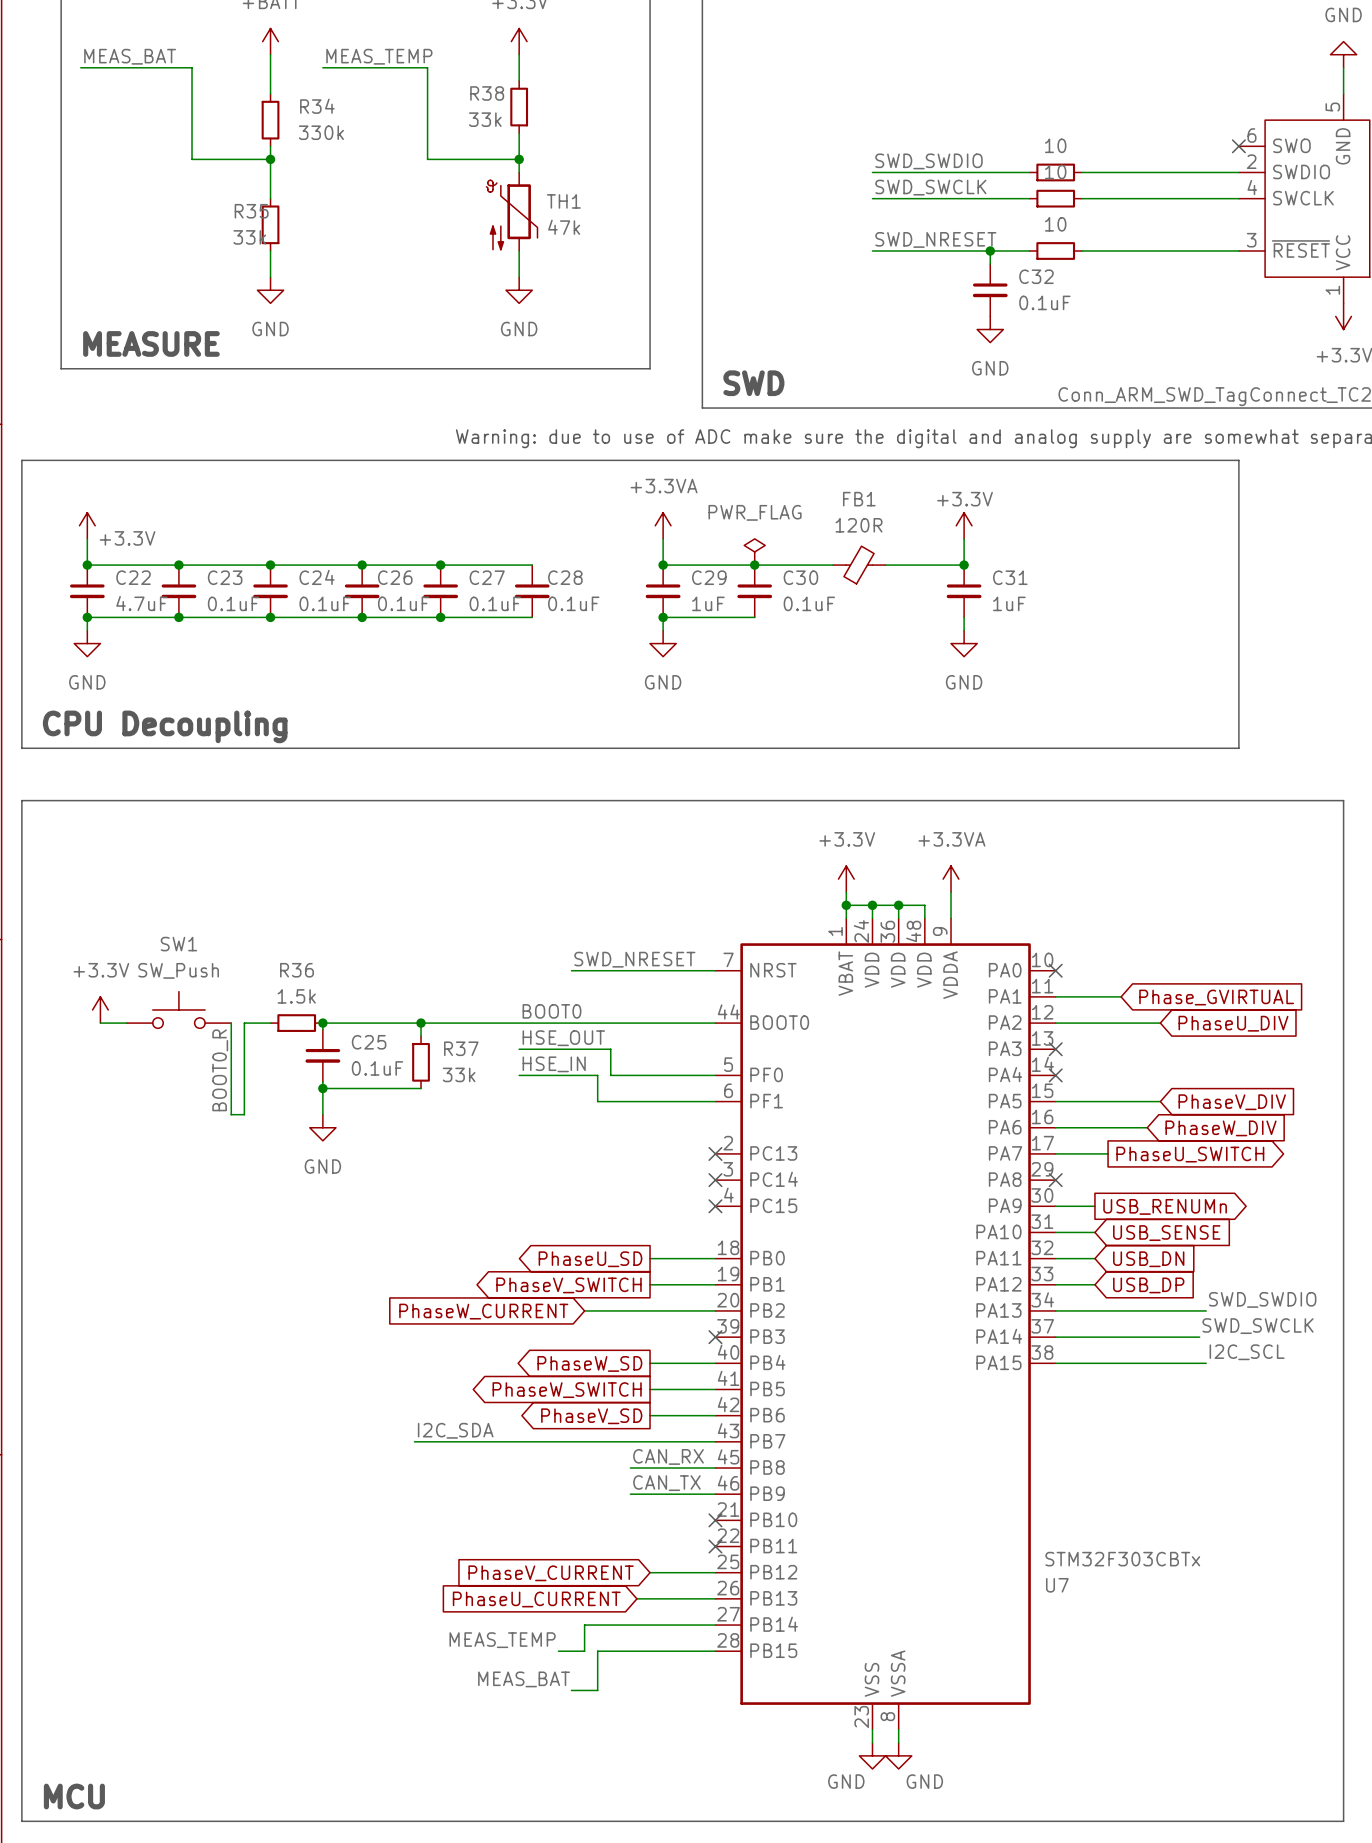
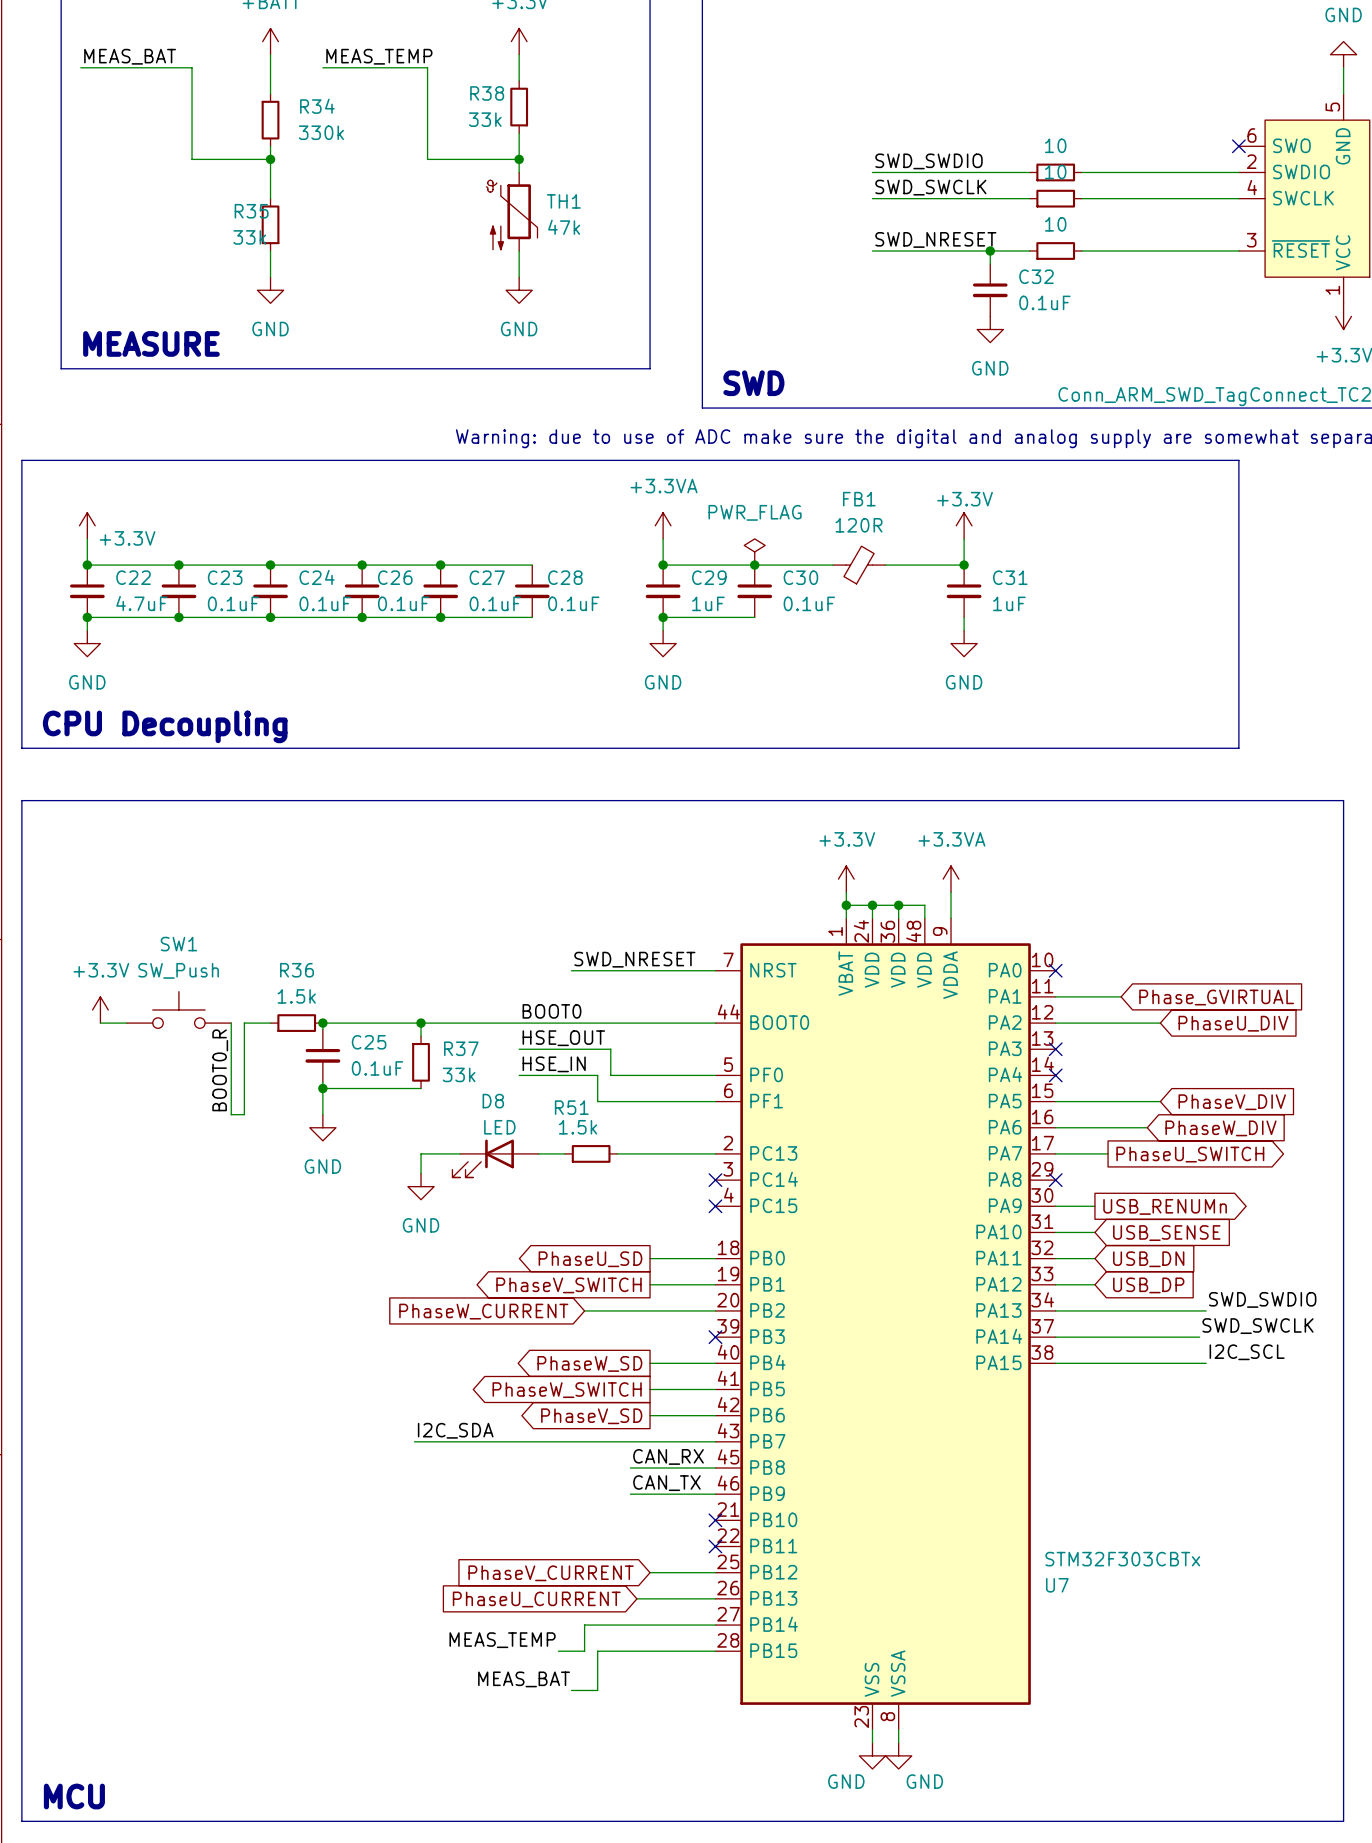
wire: none -> (460, 1153) (421, 1153) (421, 1173)
wire: none -> (538, 1153) (564, 1153)
R51: none -> 1.5k (591, 1153)
wire: none -> (617, 1153) (715, 1153)
no-connect mark: (715, 1153) -> none
D8: none -> LED (495, 1158)
power symbol: none -> GND (421, 1186)

